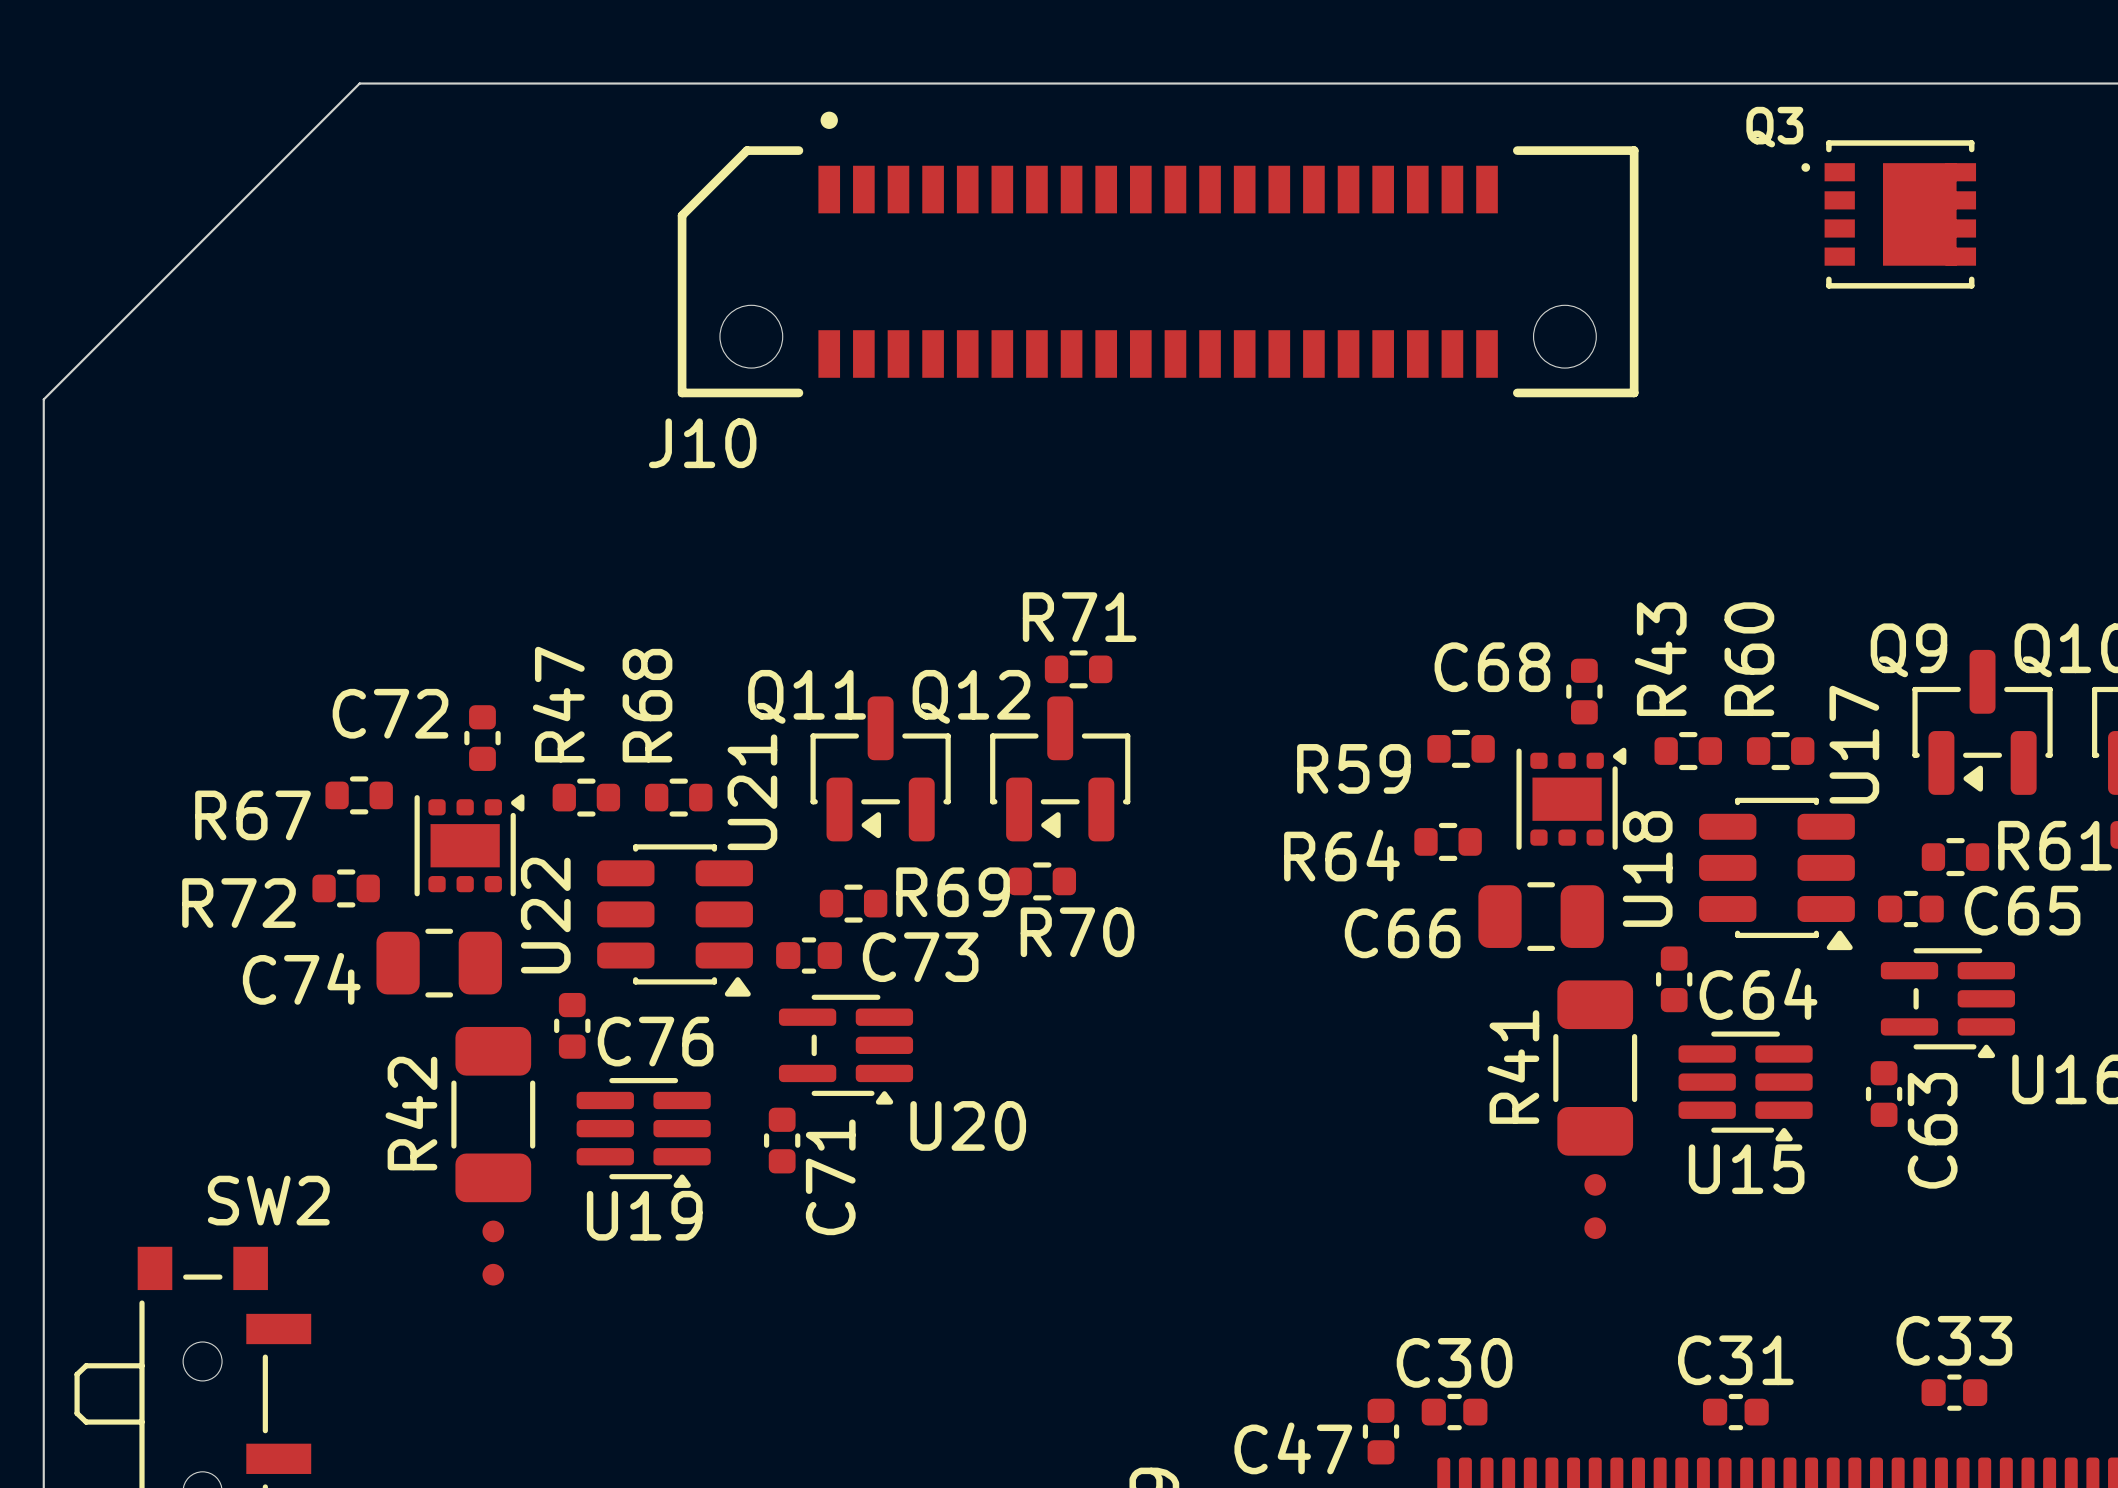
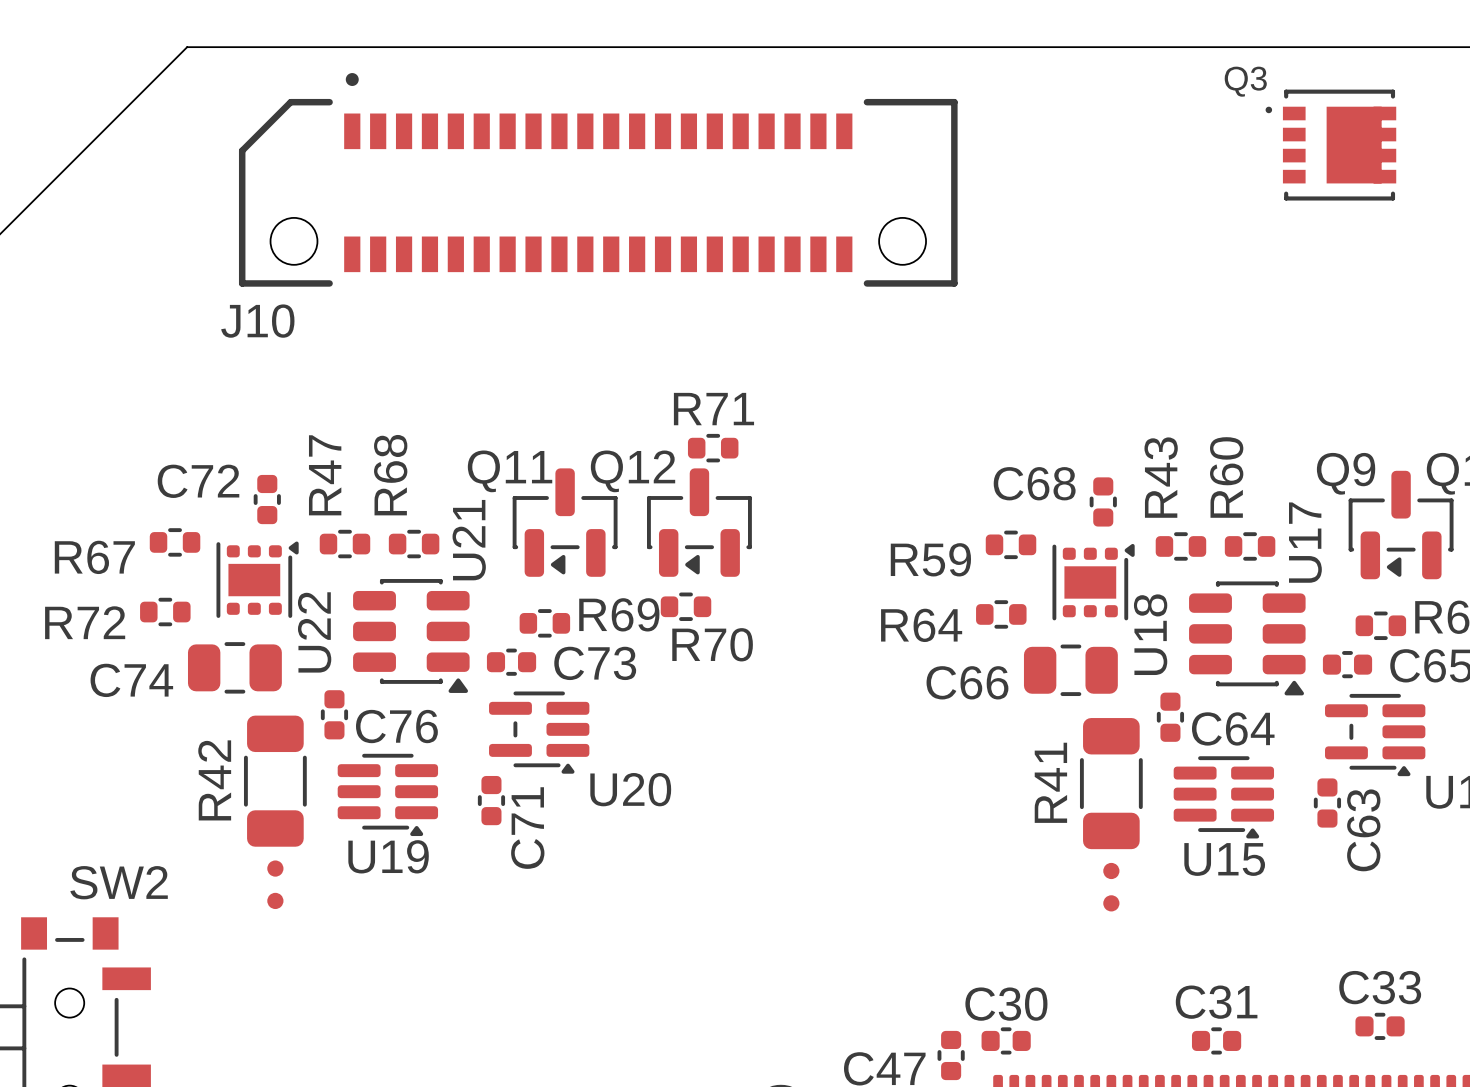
J10 position: (1158, 254) -> (598, 179)
R71 position: (1078, 669) -> (713, 448)
C72 position: (482, 738) -> (267, 499)
Q11 position: (880, 768) -> (565, 522)
Q12 position: (1060, 768) -> (699, 522)
R67 position: (359, 795) -> (175, 542)
R47 position: (586, 797) -> (344, 544)
R68 position: (678, 797) -> (414, 544)
U22 position: (469, 845) -> (257, 579)
R70 position: (1042, 881) -> (686, 606)
R72 position: (346, 888) -> (165, 612)
R69 position: (853, 903) -> (544, 623)
U21 position: (675, 920) -> (411, 635)
C73 position: (809, 955) -> (511, 662)
C74 position: (439, 963) -> (234, 667)
C76 position: (572, 1025) -> (334, 714)
U20 position: (846, 1049) -> (539, 732)
R42 position: (493, 1114) -> (275, 781)
U19 position: (643, 1132) -> (387, 794)
C71 position: (782, 1140) -> (491, 800)
part position: (493, 1253) -> (275, 884)

